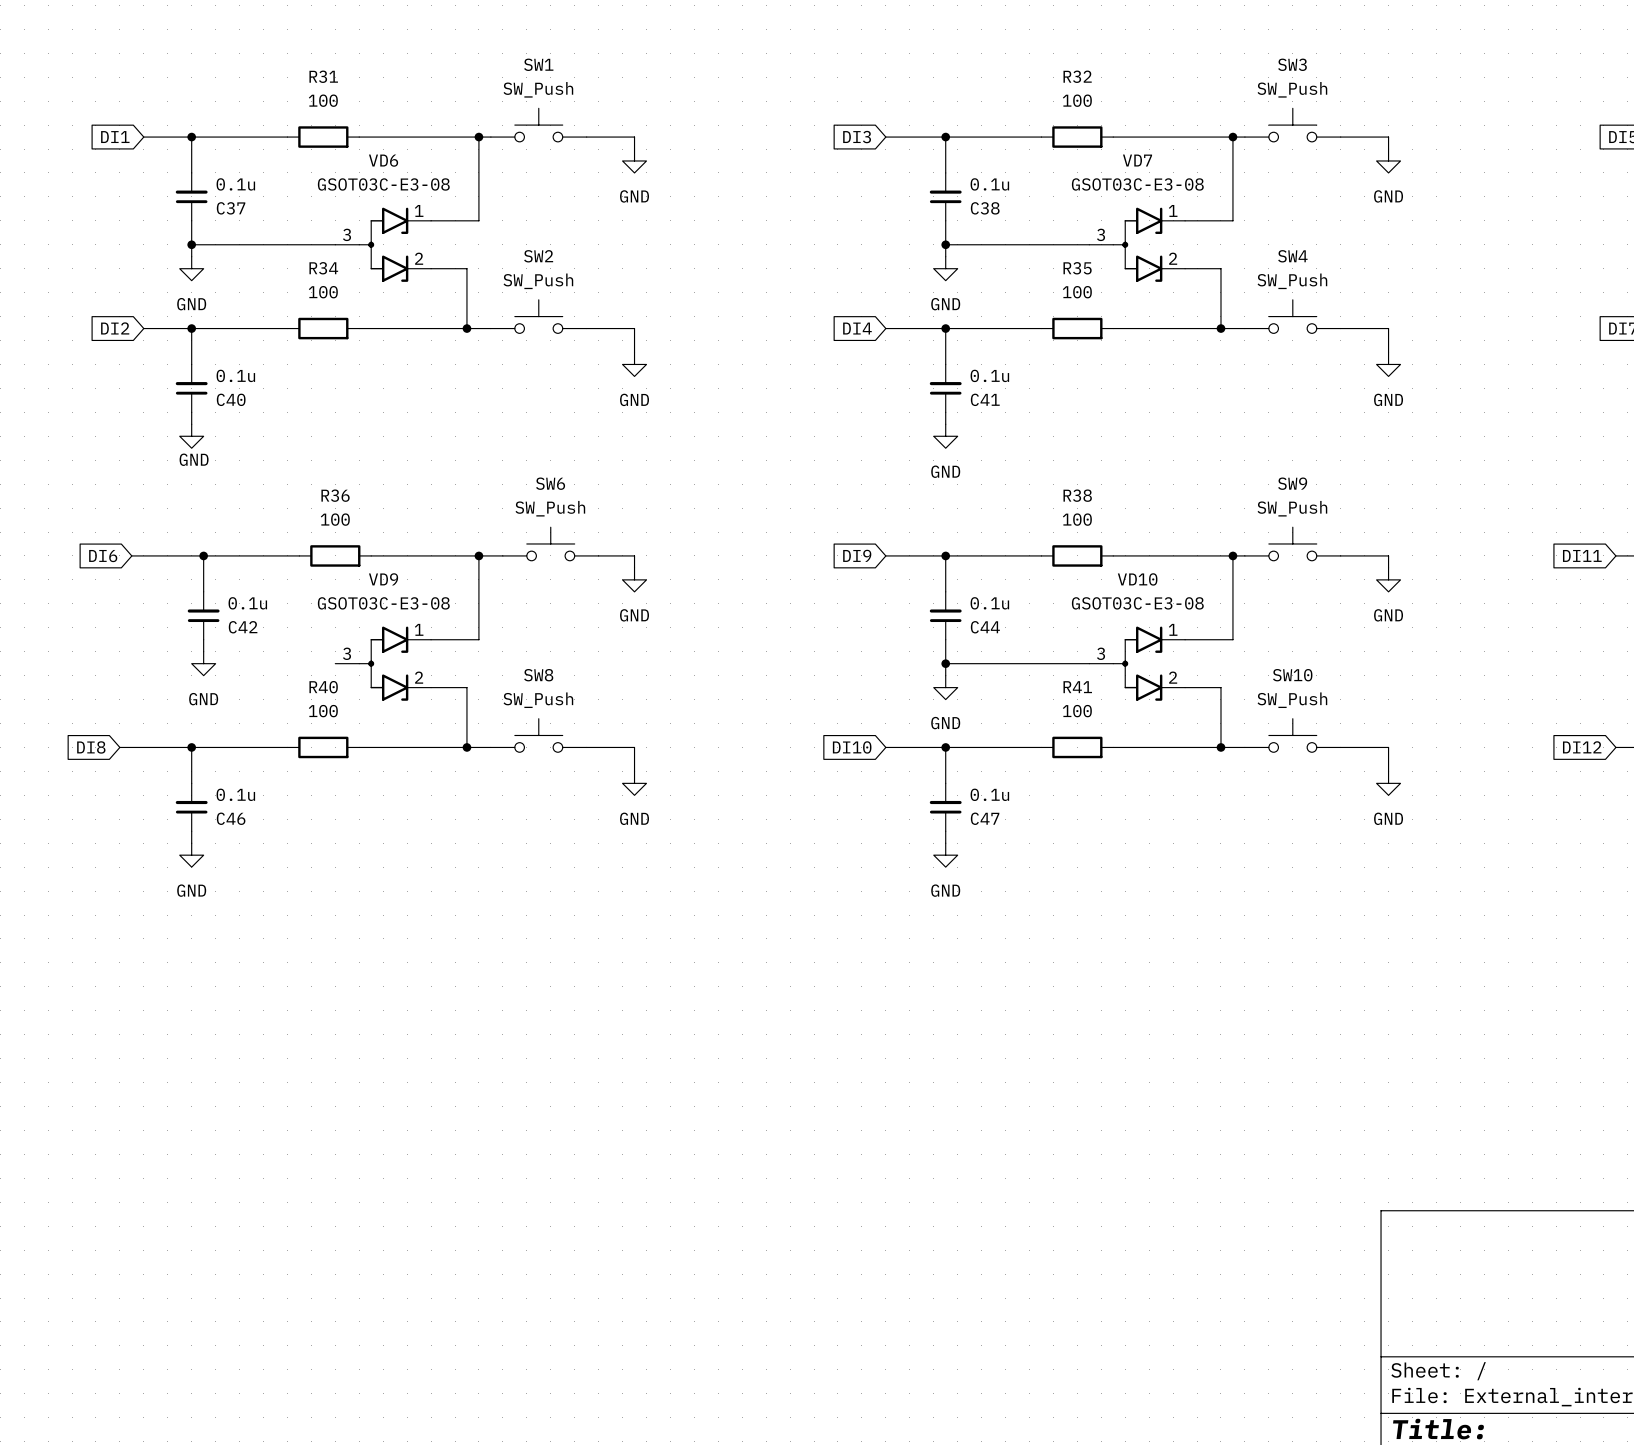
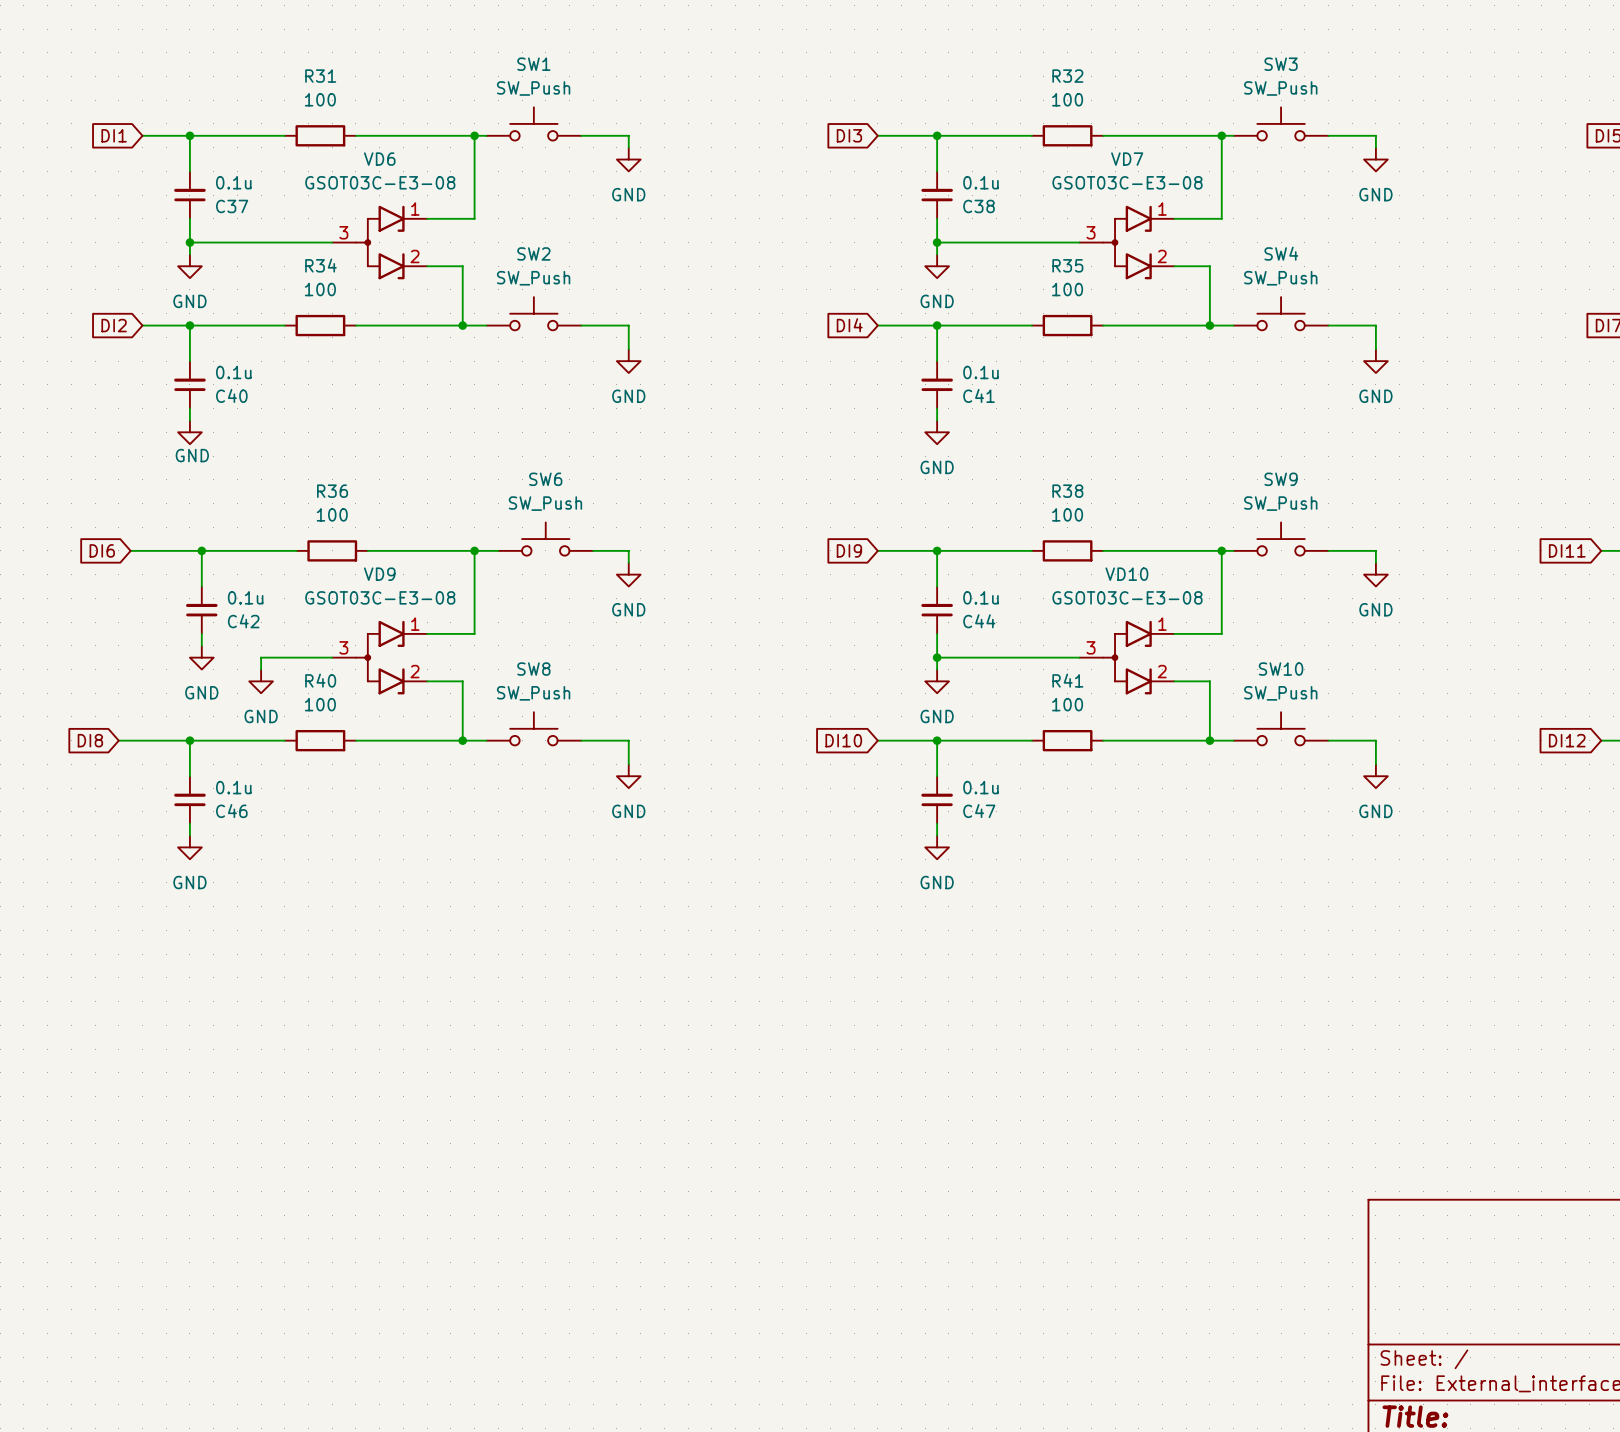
wire: none -> (332, 657) (261, 657) (261, 669)
power symbol: none -> GND (261, 681)

